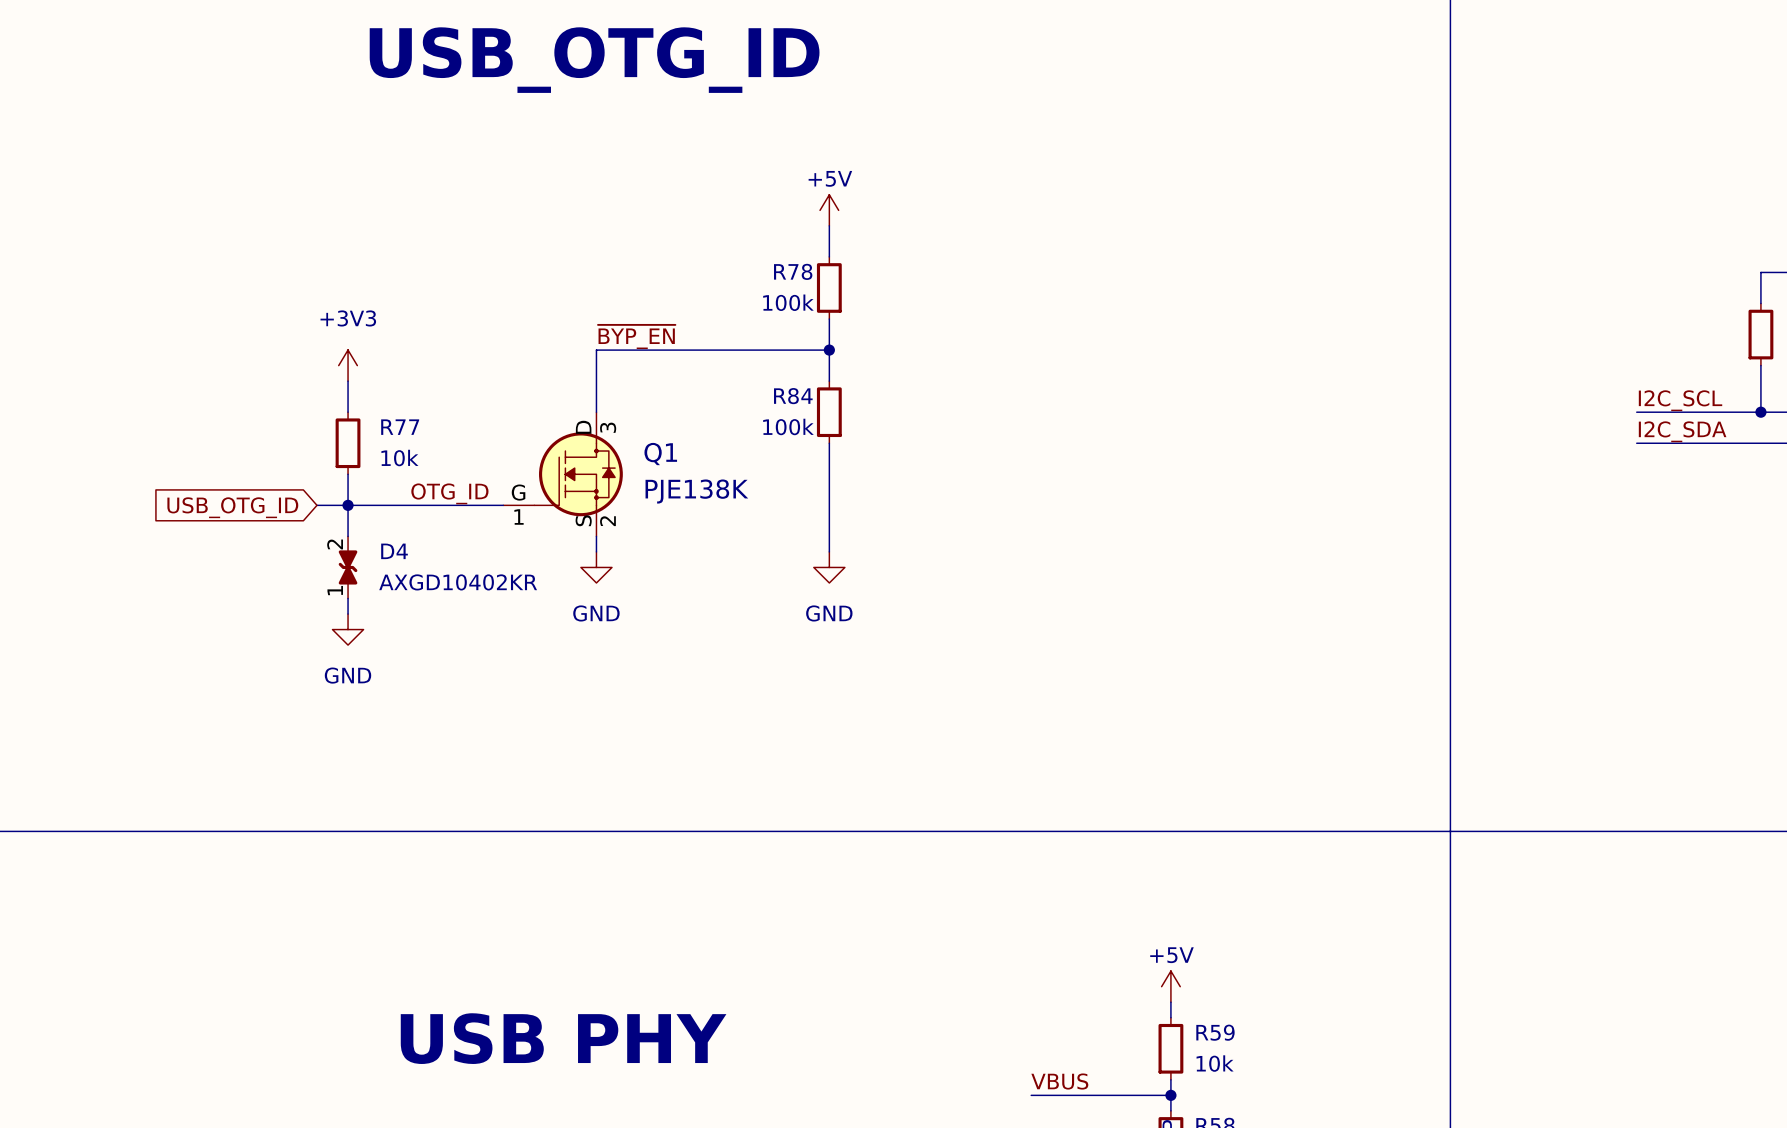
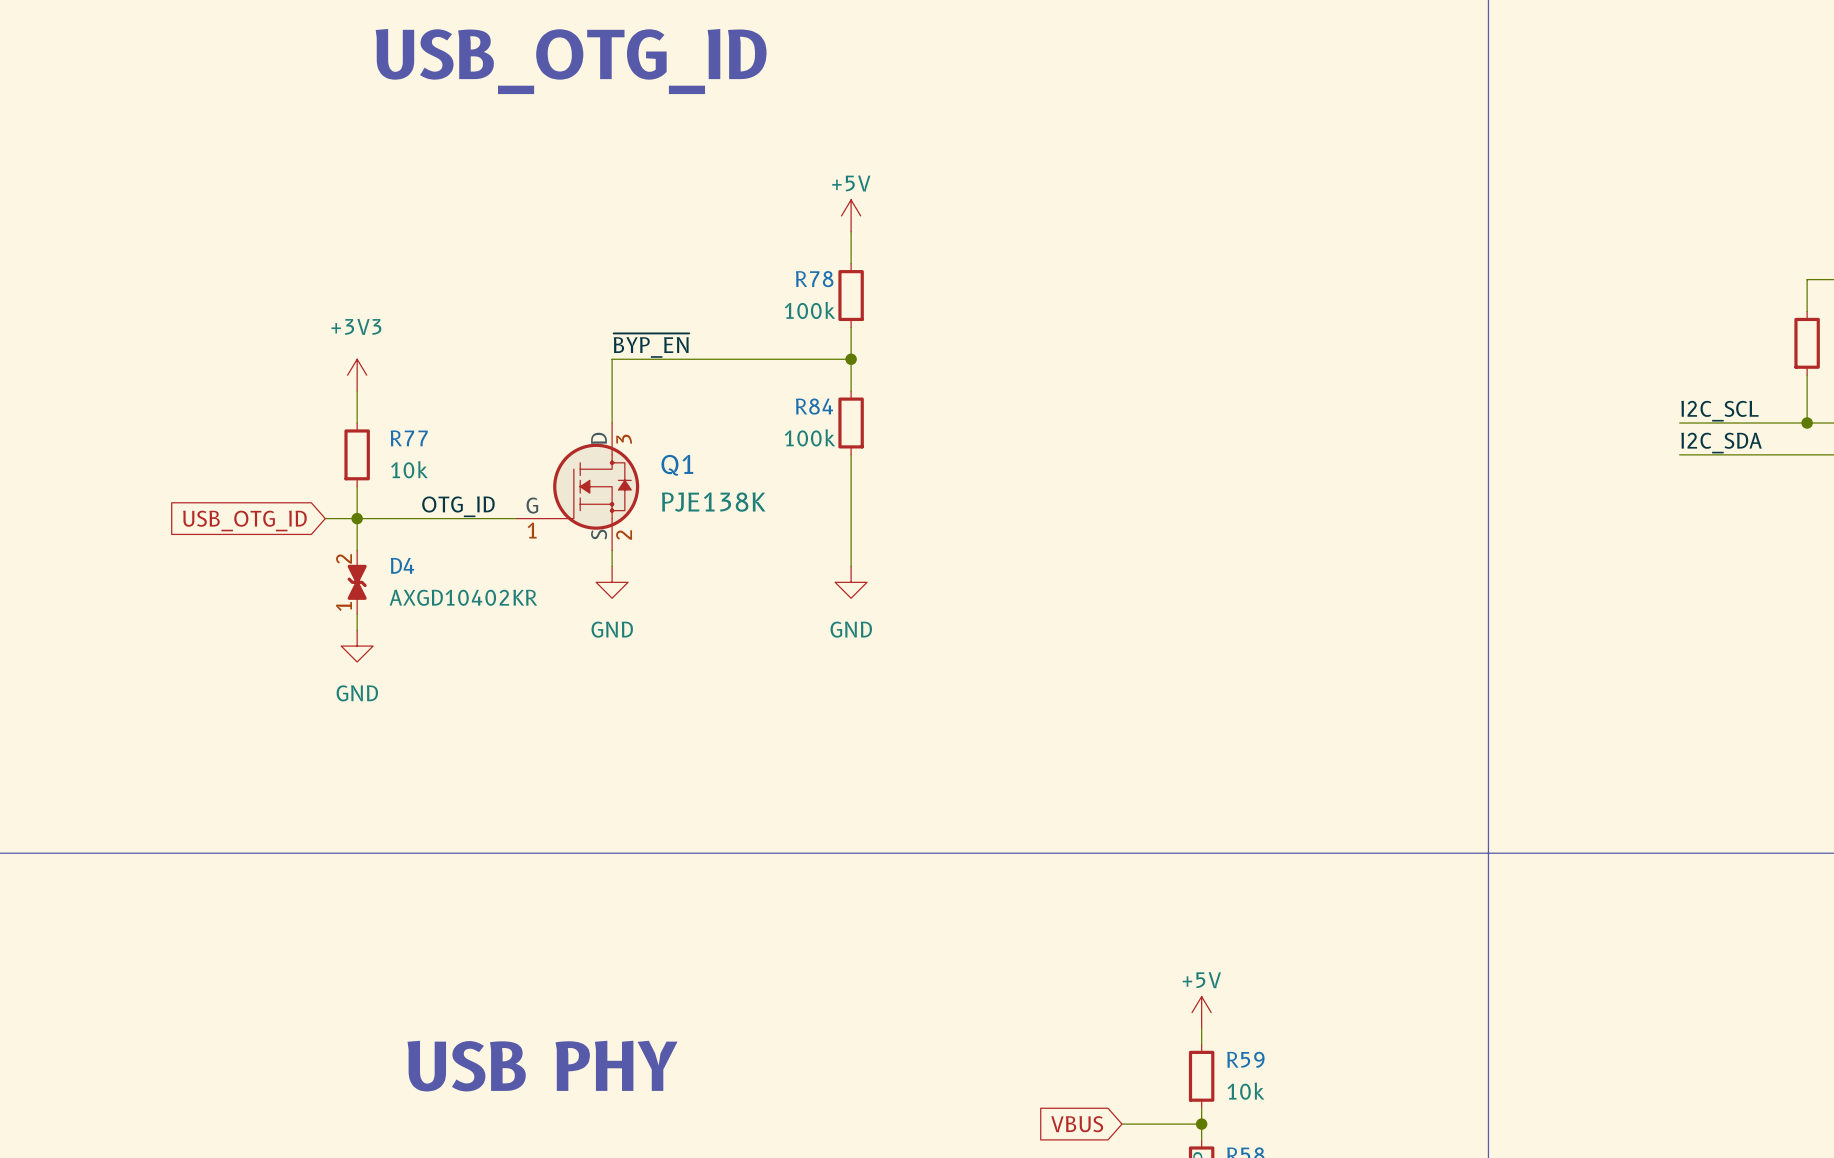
label: VBUS (1059, 1081) -> none
wire: (1031, 1095) (1093, 1095) -> none
global label: none -> VBUS (1077, 1124)

